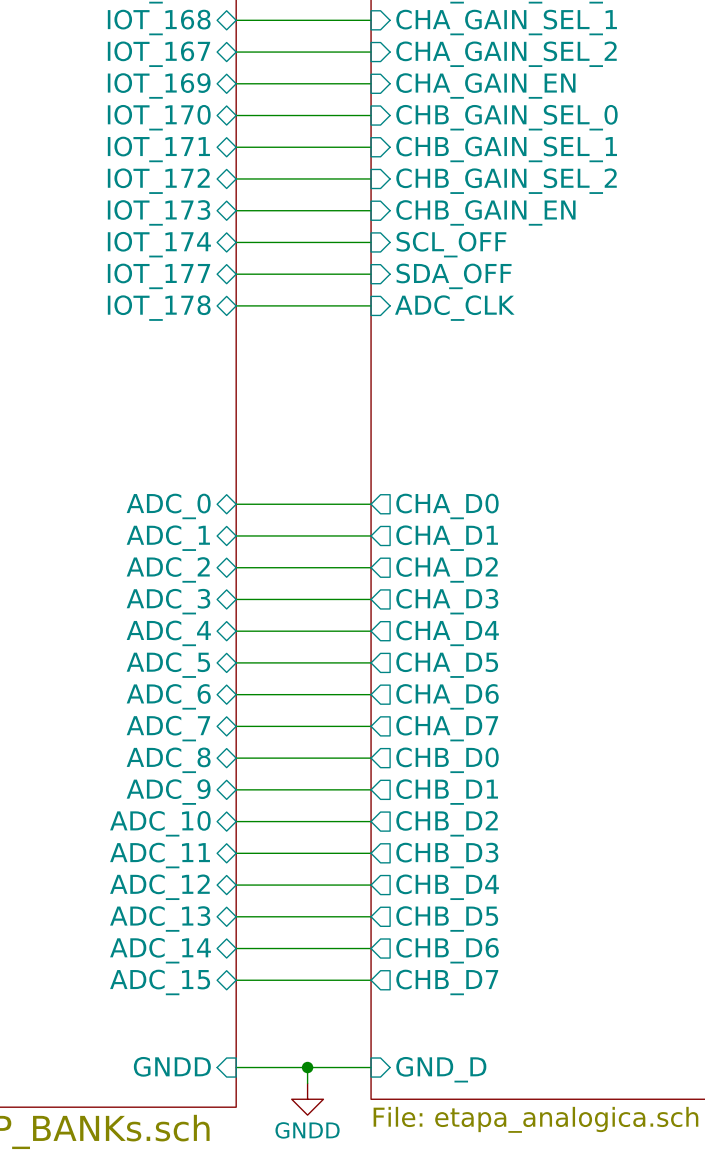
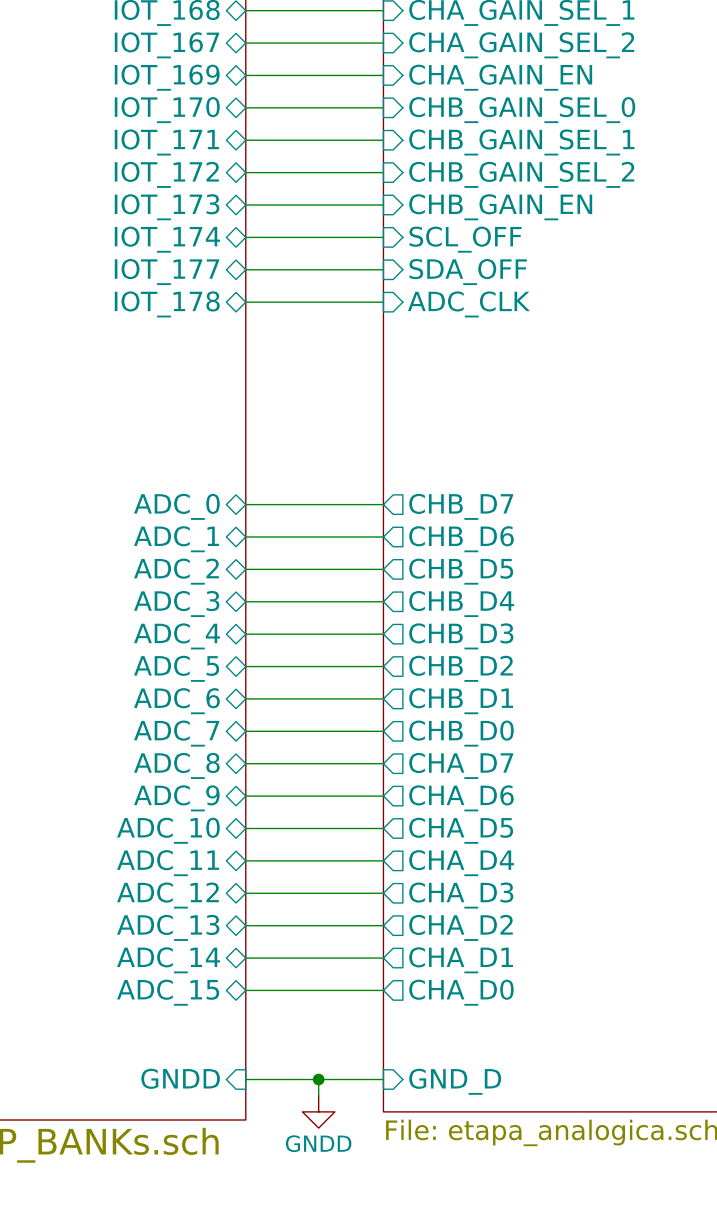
sheet pin: CHA_D0 (447, 506) -> CHB_D7 (461, 506)
sheet pin: CHA_D1 (447, 538) -> CHB_D6 (461, 539)
sheet pin: CHA_D2 (447, 569) -> CHB_D5 (461, 571)
sheet pin: CHA_D3 (447, 601) -> CHB_D4 (461, 604)
sheet pin: CHA_D4 (447, 633) -> CHB_D3 (461, 636)
sheet pin: CHA_D5 (447, 665) -> CHB_D2 (461, 668)
sheet pin: CHA_D6 (447, 696) -> CHB_D1 (461, 701)
sheet pin: CHA_D7 (447, 728) -> CHB_D0 (461, 733)
sheet pin: CHB_D0 (447, 760) -> CHA_D7 (461, 765)
sheet pin: CHB_D1 (447, 792) -> CHA_D6 (461, 798)
sheet pin: CHB_D2 (447, 823) -> CHA_D5 (461, 830)
sheet pin: CHB_D3 (447, 855) -> CHA_D4 (461, 863)
sheet pin: CHB_D4 (447, 887) -> CHA_D3 (461, 895)
sheet pin: CHB_D5 (447, 918) -> CHA_D2 (461, 927)
sheet pin: CHB_D6 (447, 950) -> CHA_D1 (461, 960)
sheet pin: CHB_D7 (447, 982) -> CHA_D0 (461, 992)

